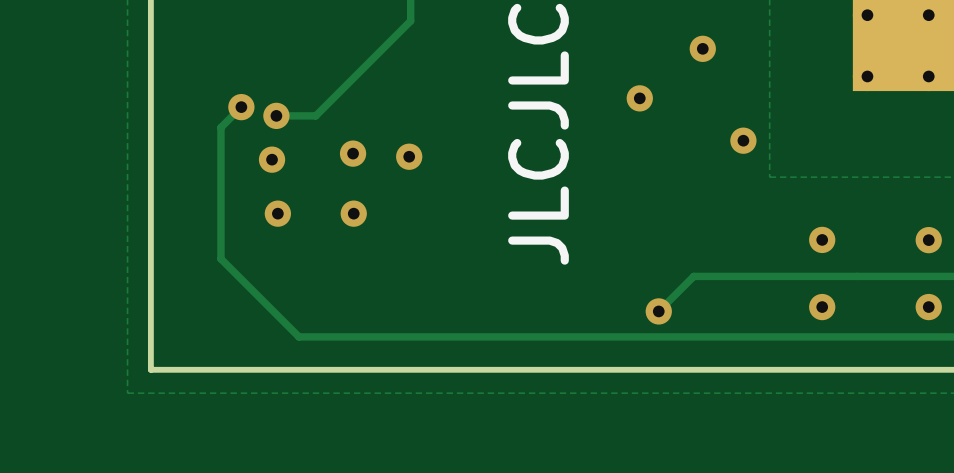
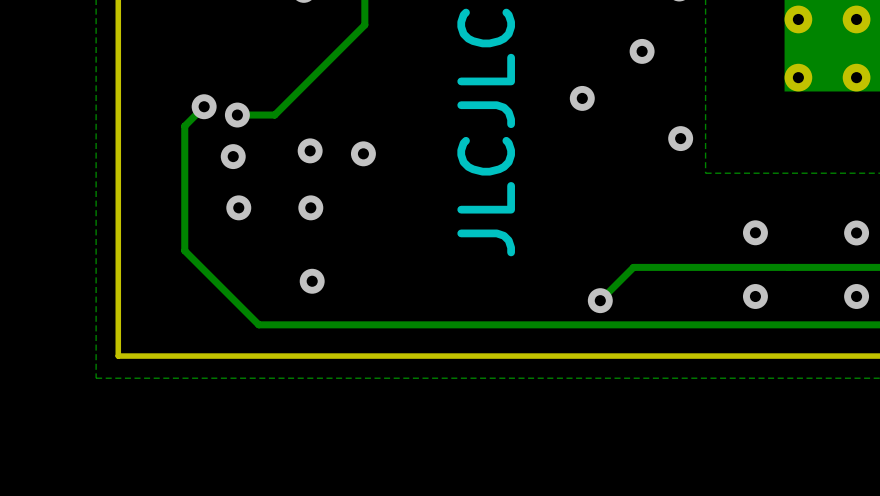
via: none -> (312, 281)

